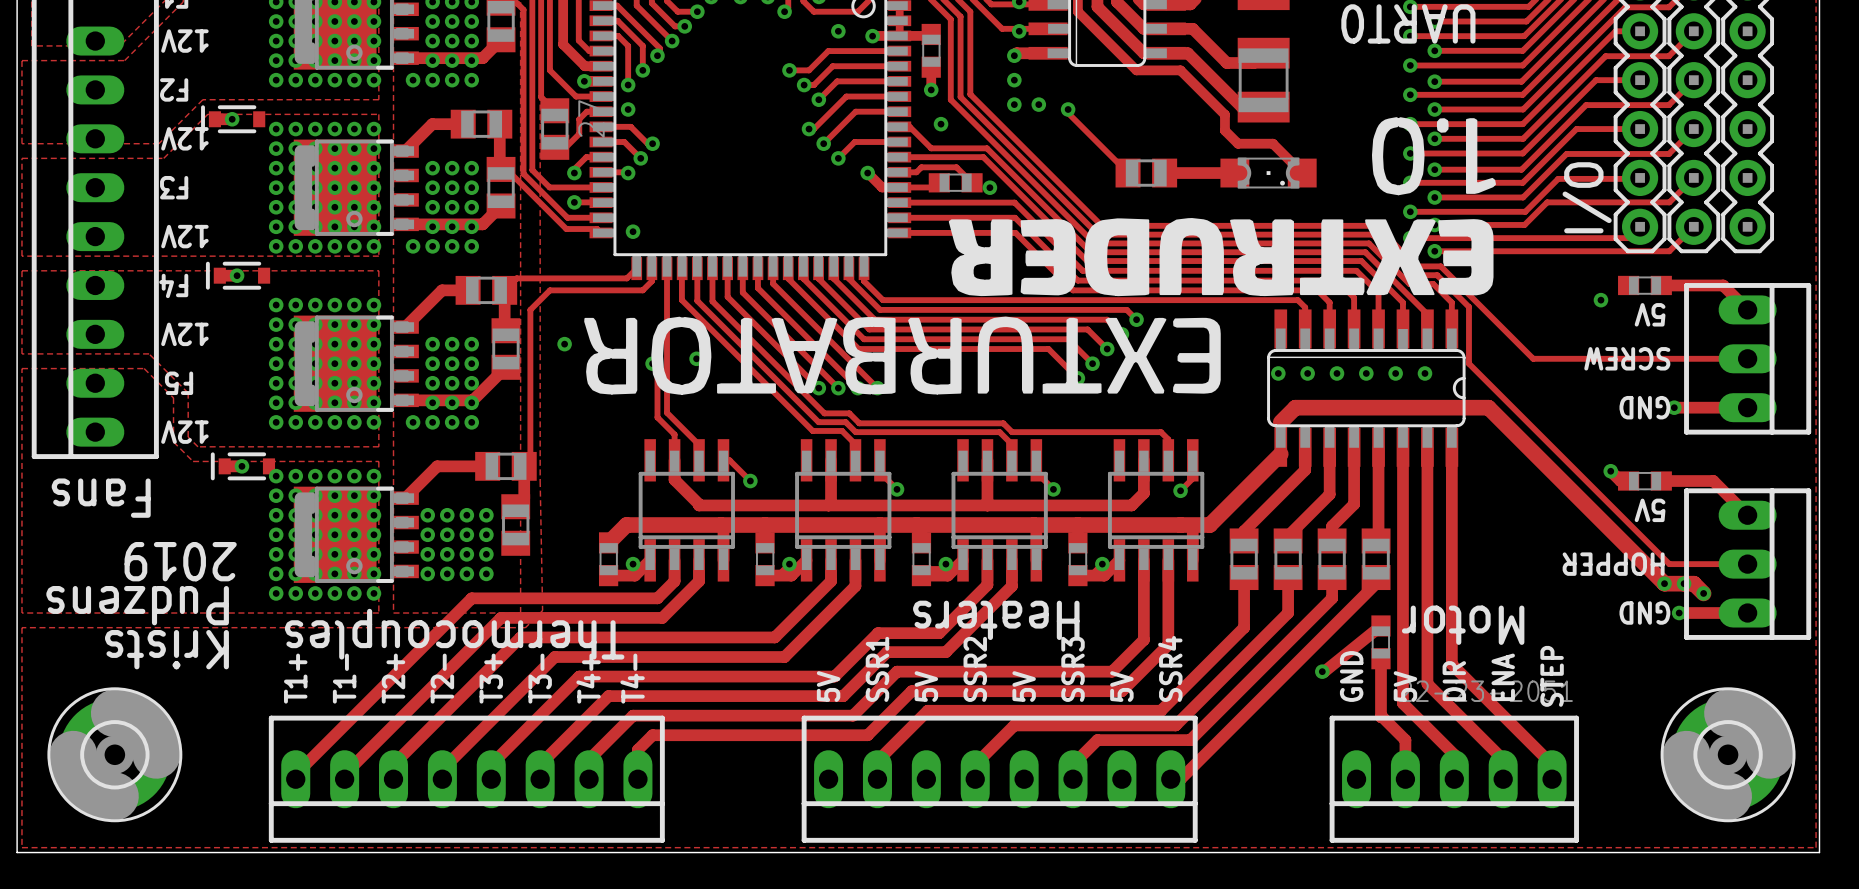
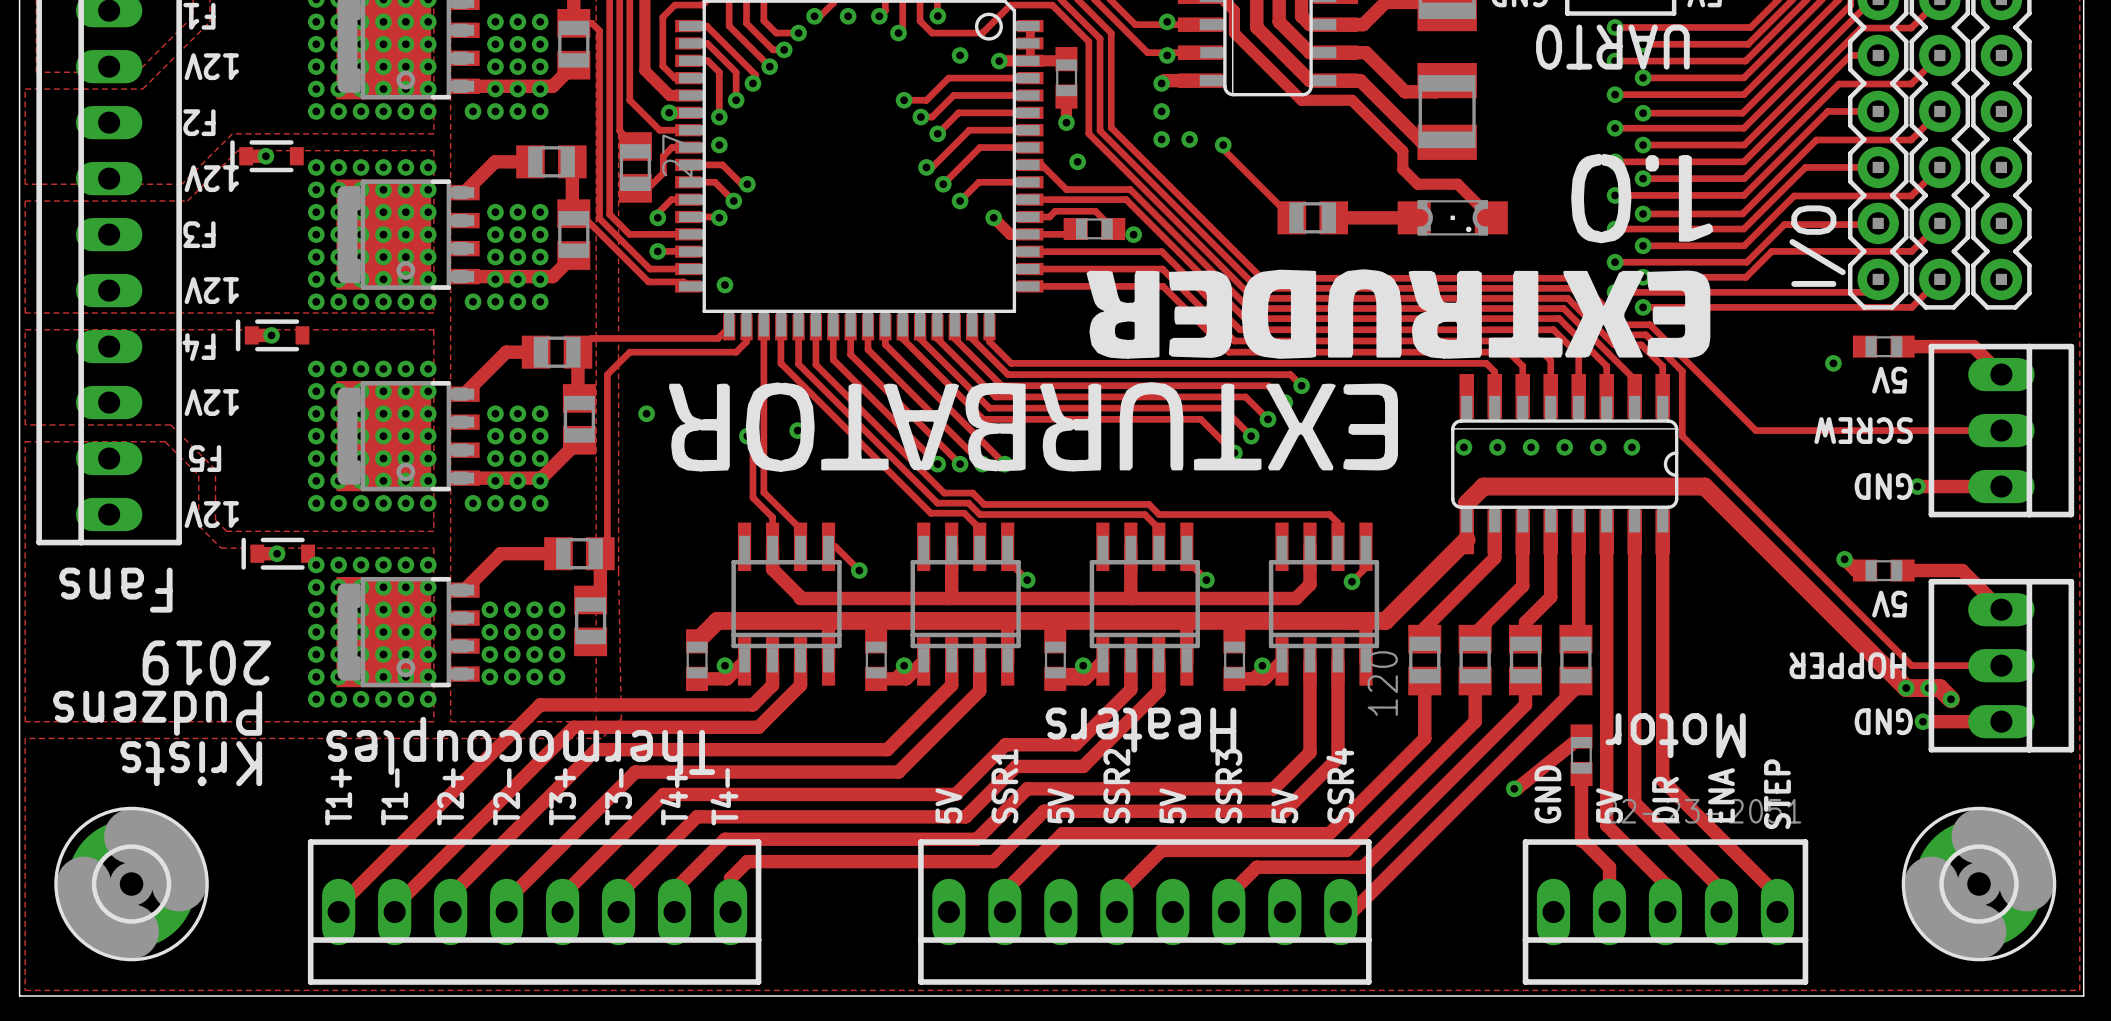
part value: none -> 120 (1382, 683)

